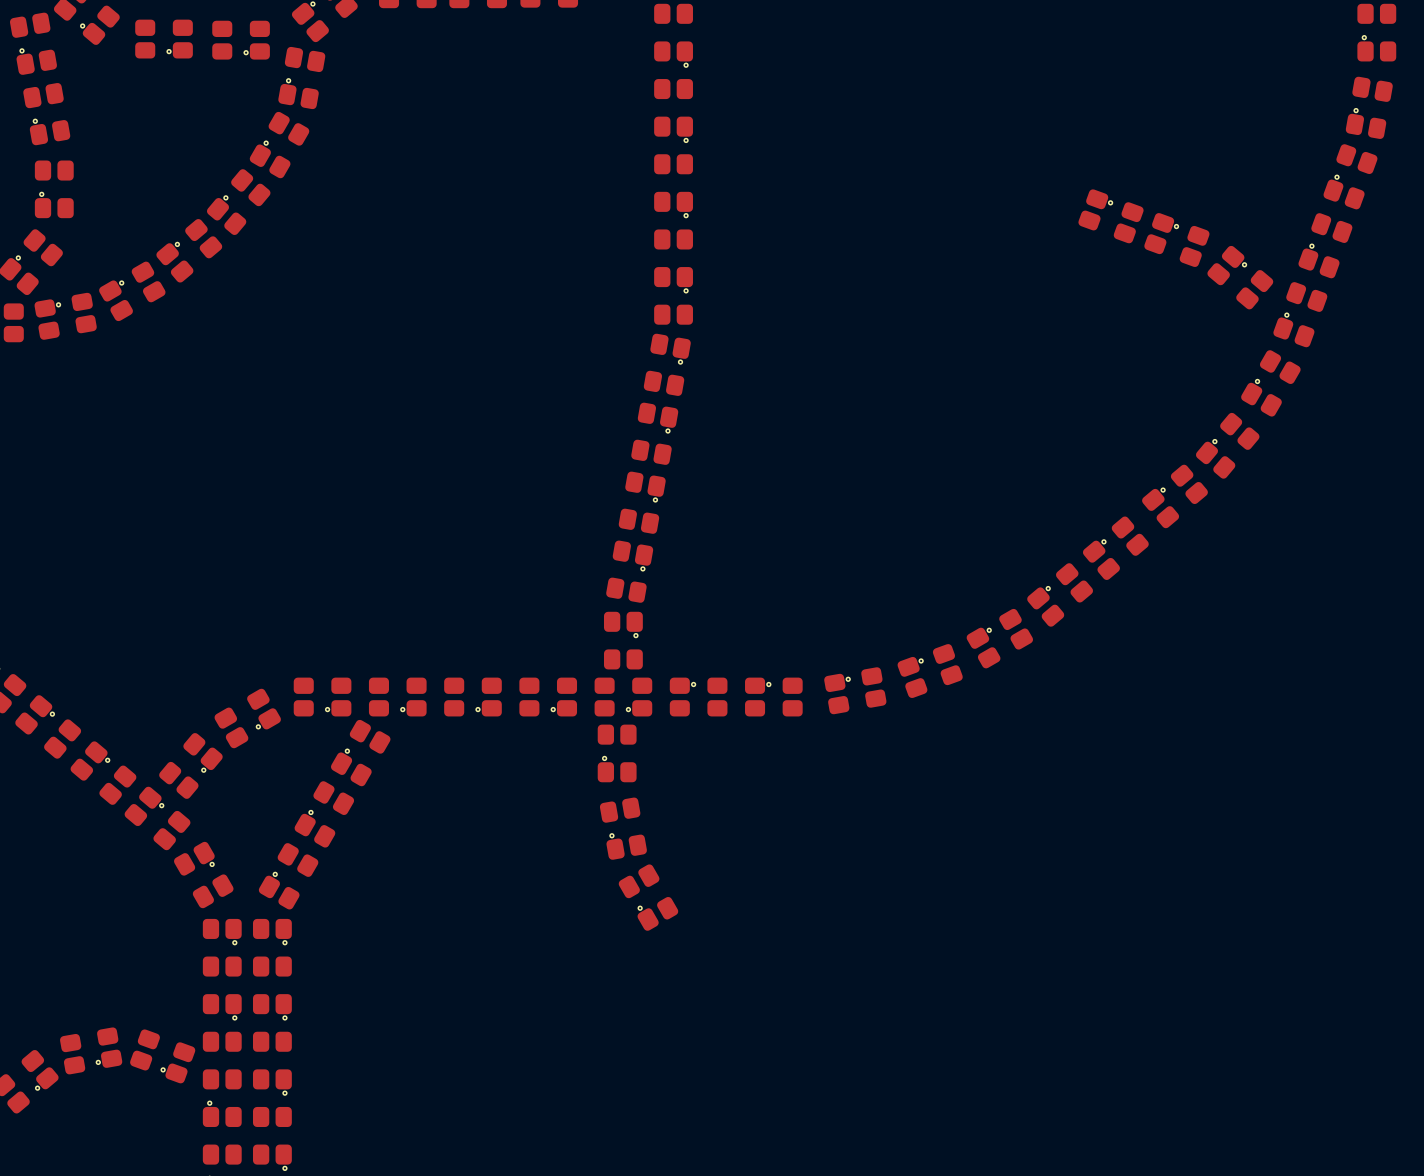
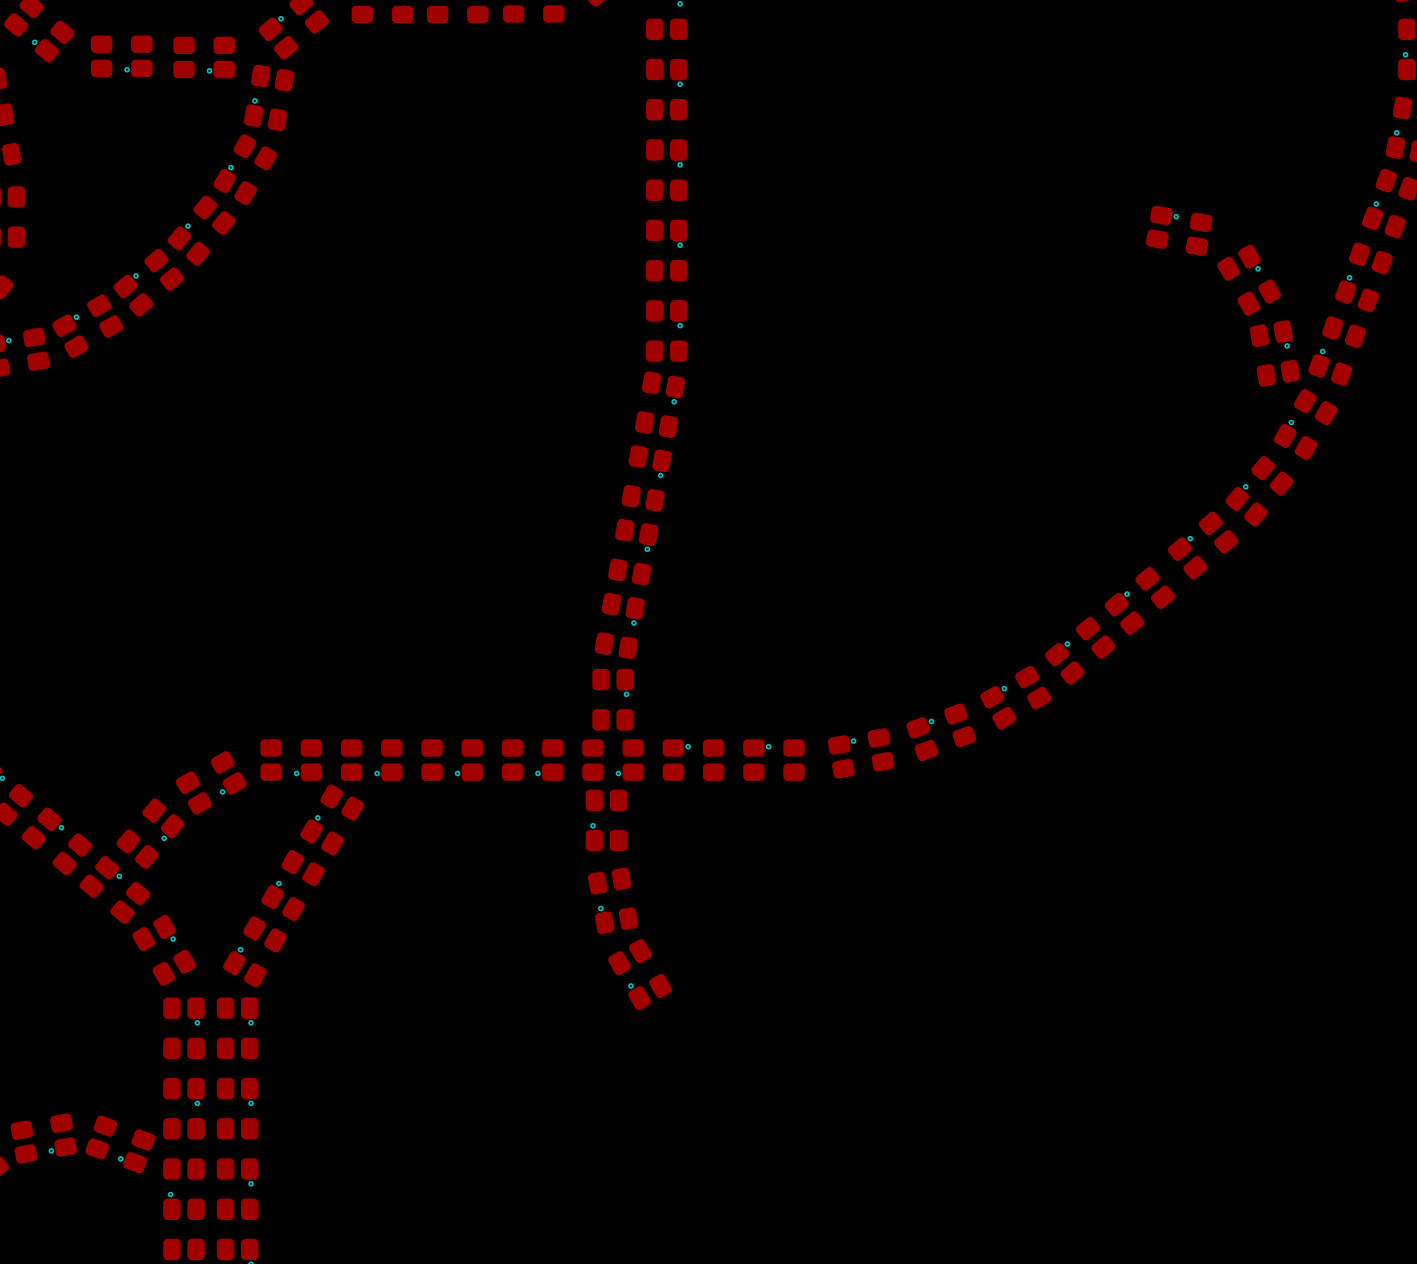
part: none -> (1179, 230)
part: (1111, 216) -> none
part: (1176, 240) -> none
part: none -> (1249, 280)
part: (1240, 277) -> none
part: none -> (1274, 353)

